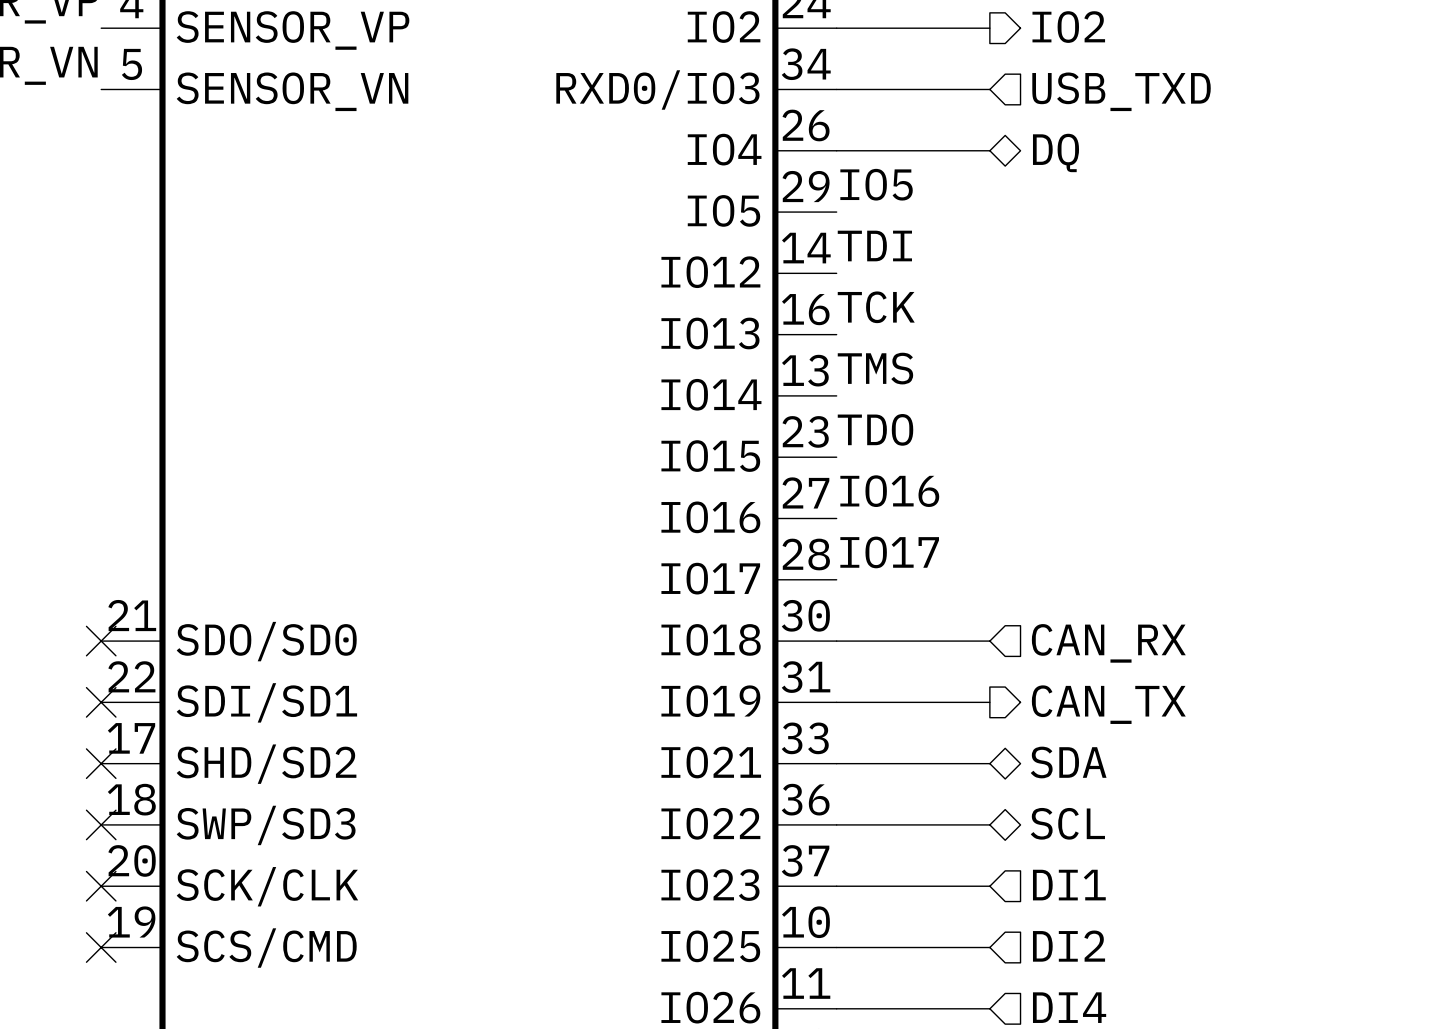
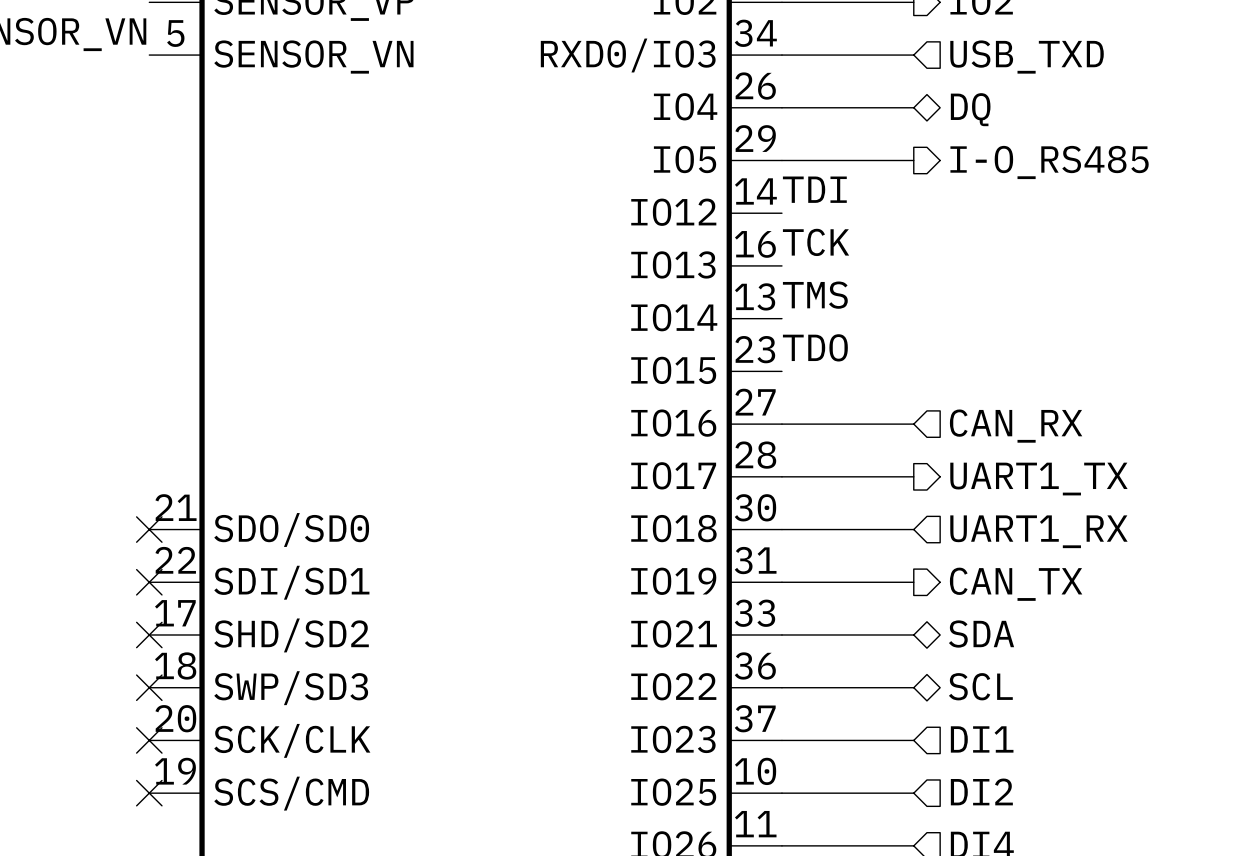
label: IO5 (876, 184) -> none
wire: none -> (781, 160) (913, 160)
hierarchical label: none -> I-O_RS485 (1049, 162)
label: IO16 (889, 491) -> none
wire: none -> (781, 424) (913, 424)
hierarchical label: none -> CAN_RX (1016, 426)
label: IO17 (889, 552) -> none
wire: none -> (781, 476) (913, 476)
hierarchical label: none -> UART1_TX (1038, 479)
hierarchical label: CAN_RX (1108, 643) -> UART1_RX (1038, 531)

